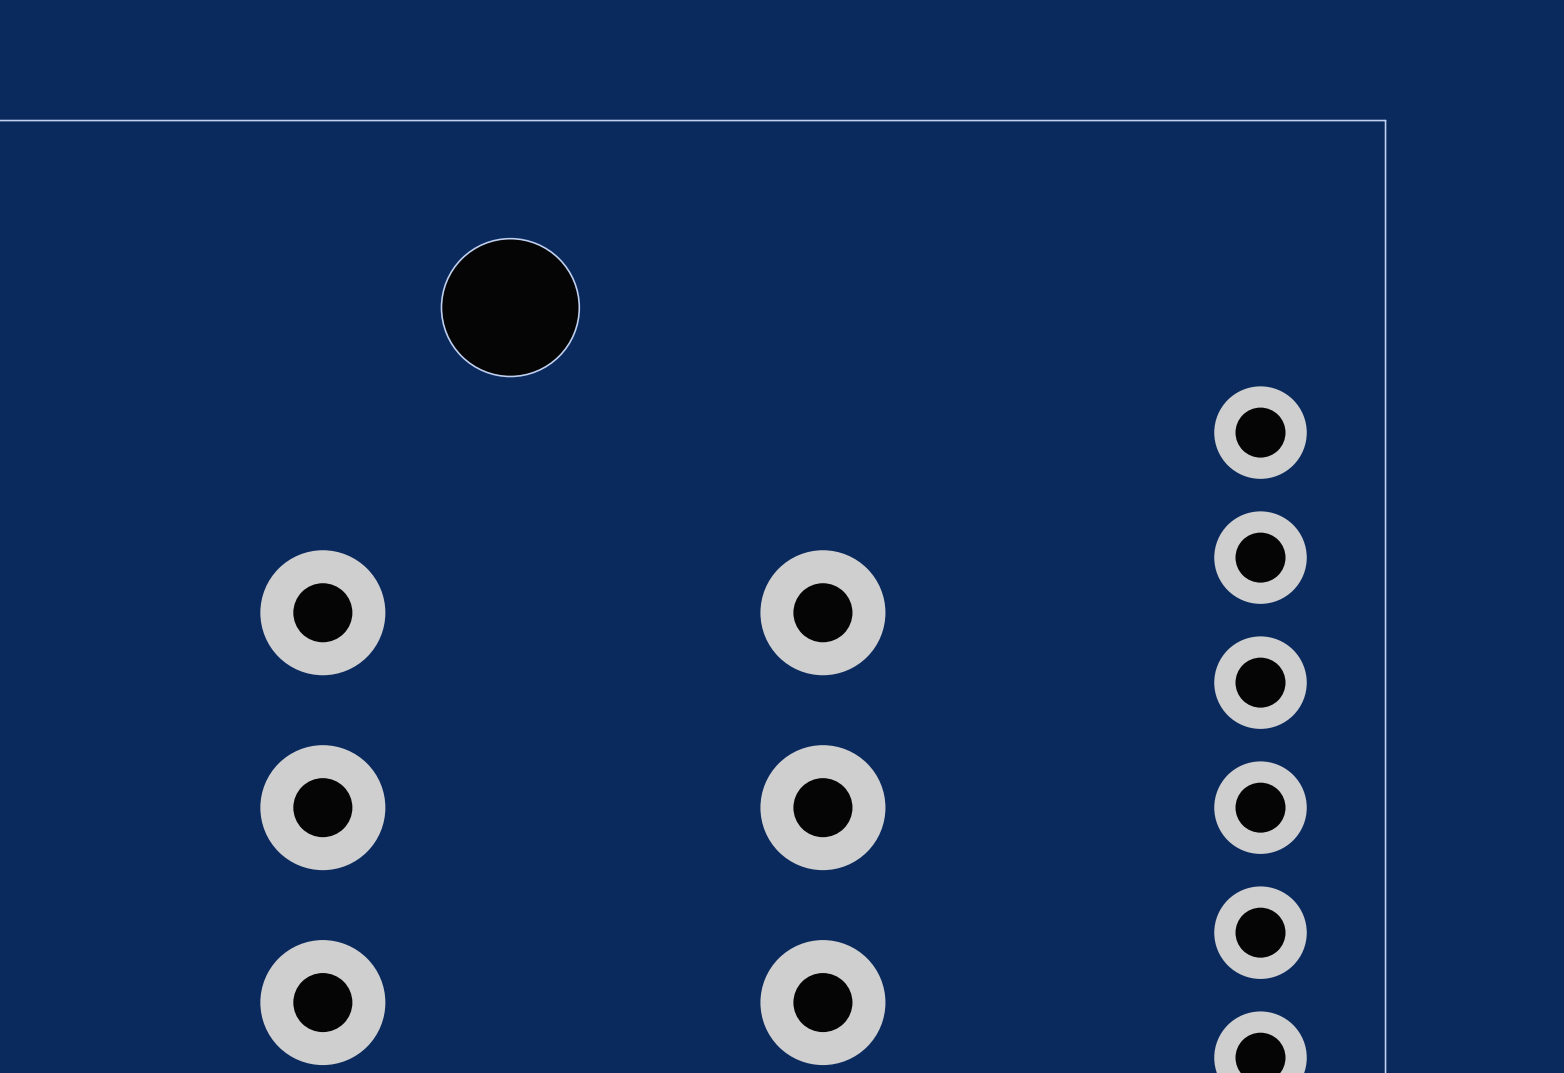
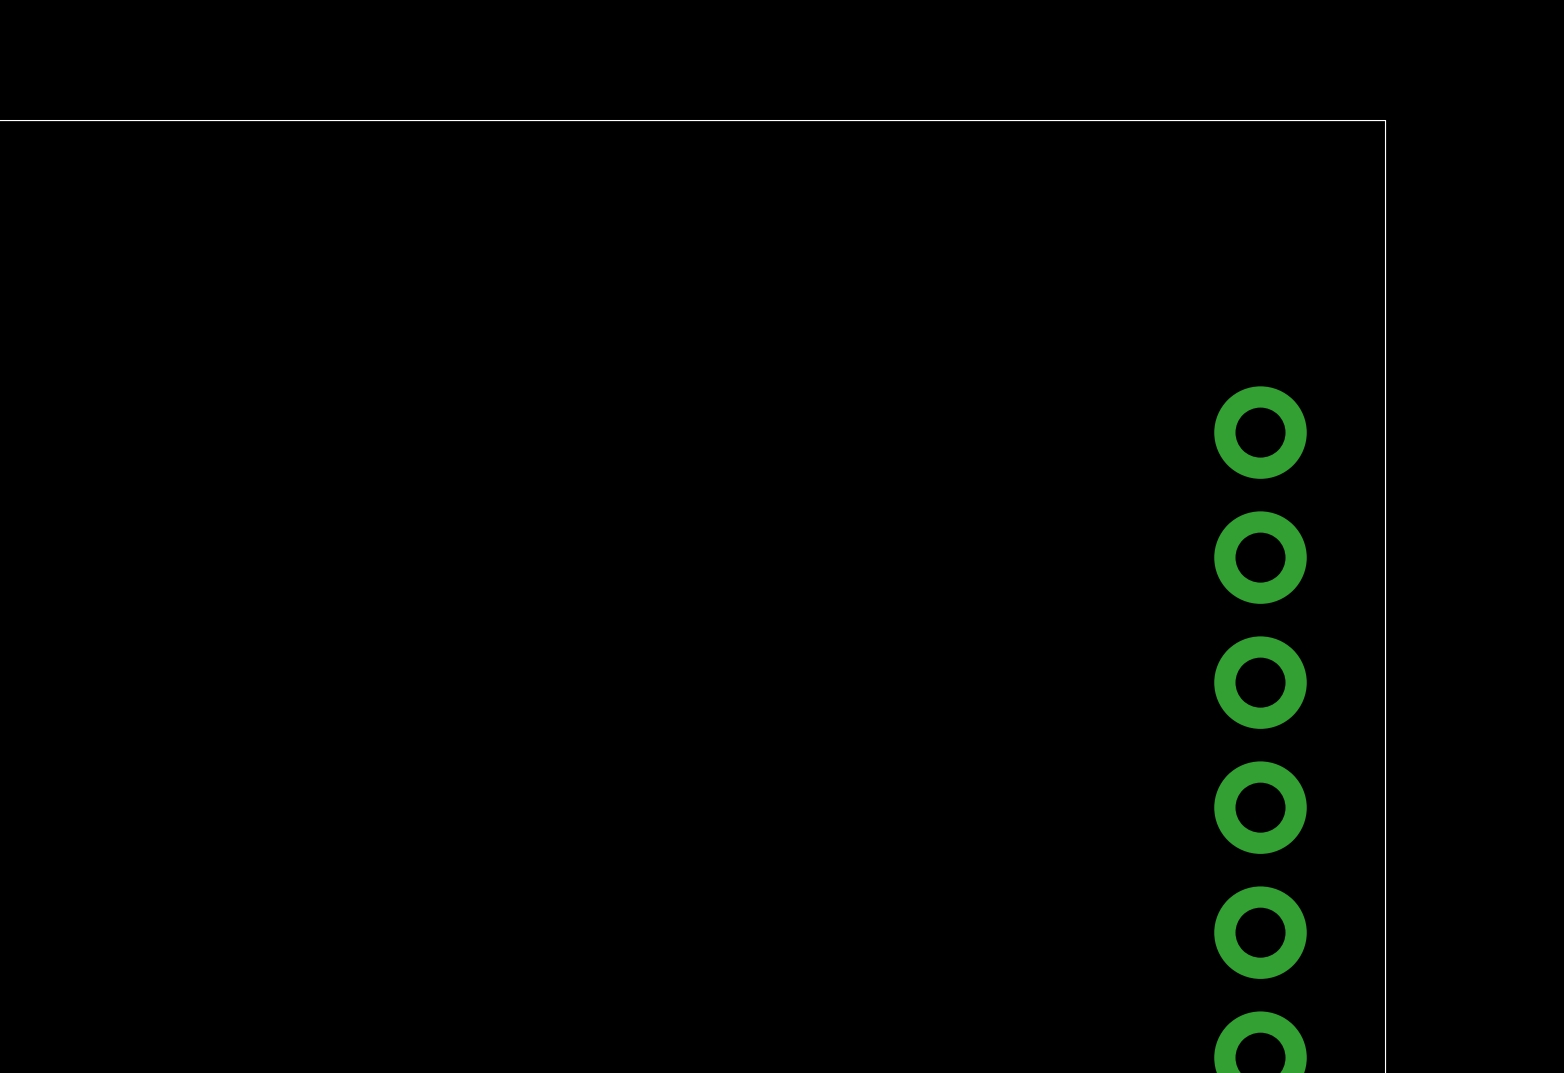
hole: (510, 307) -> none
part: (322, 807) -> none
part: (822, 807) -> none

